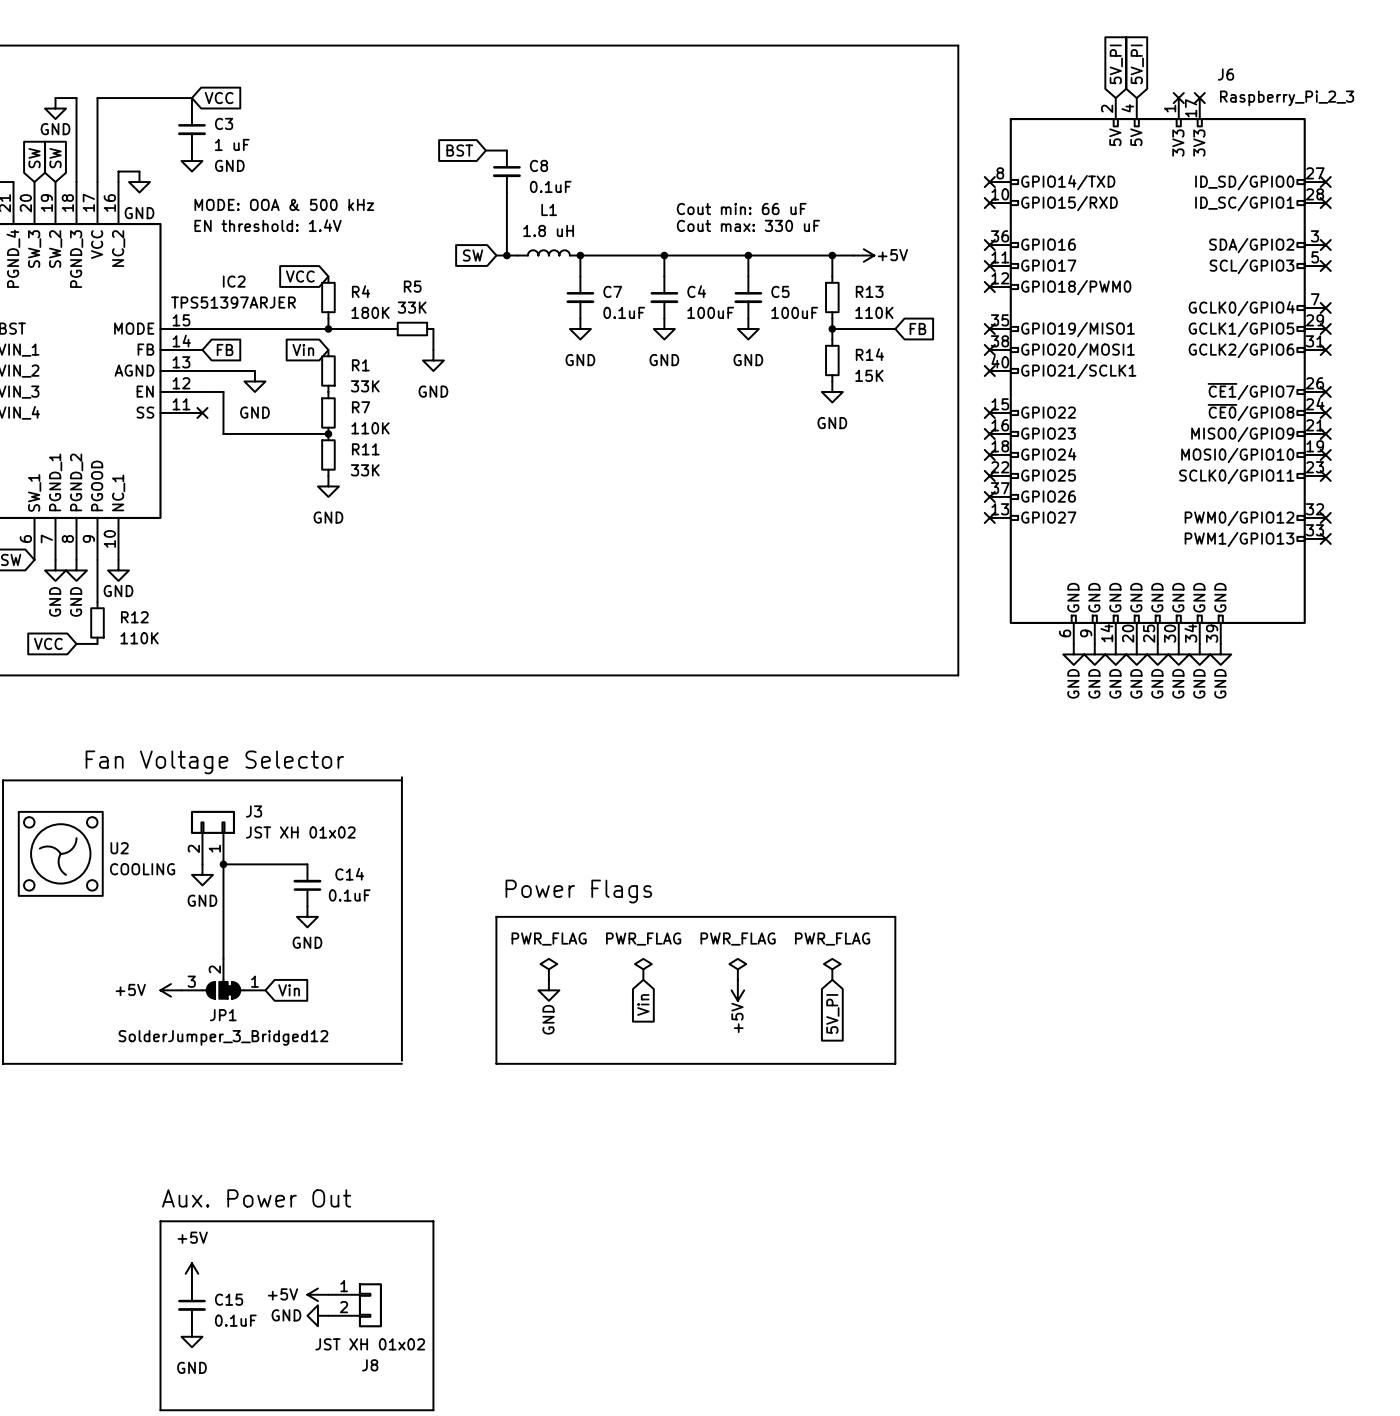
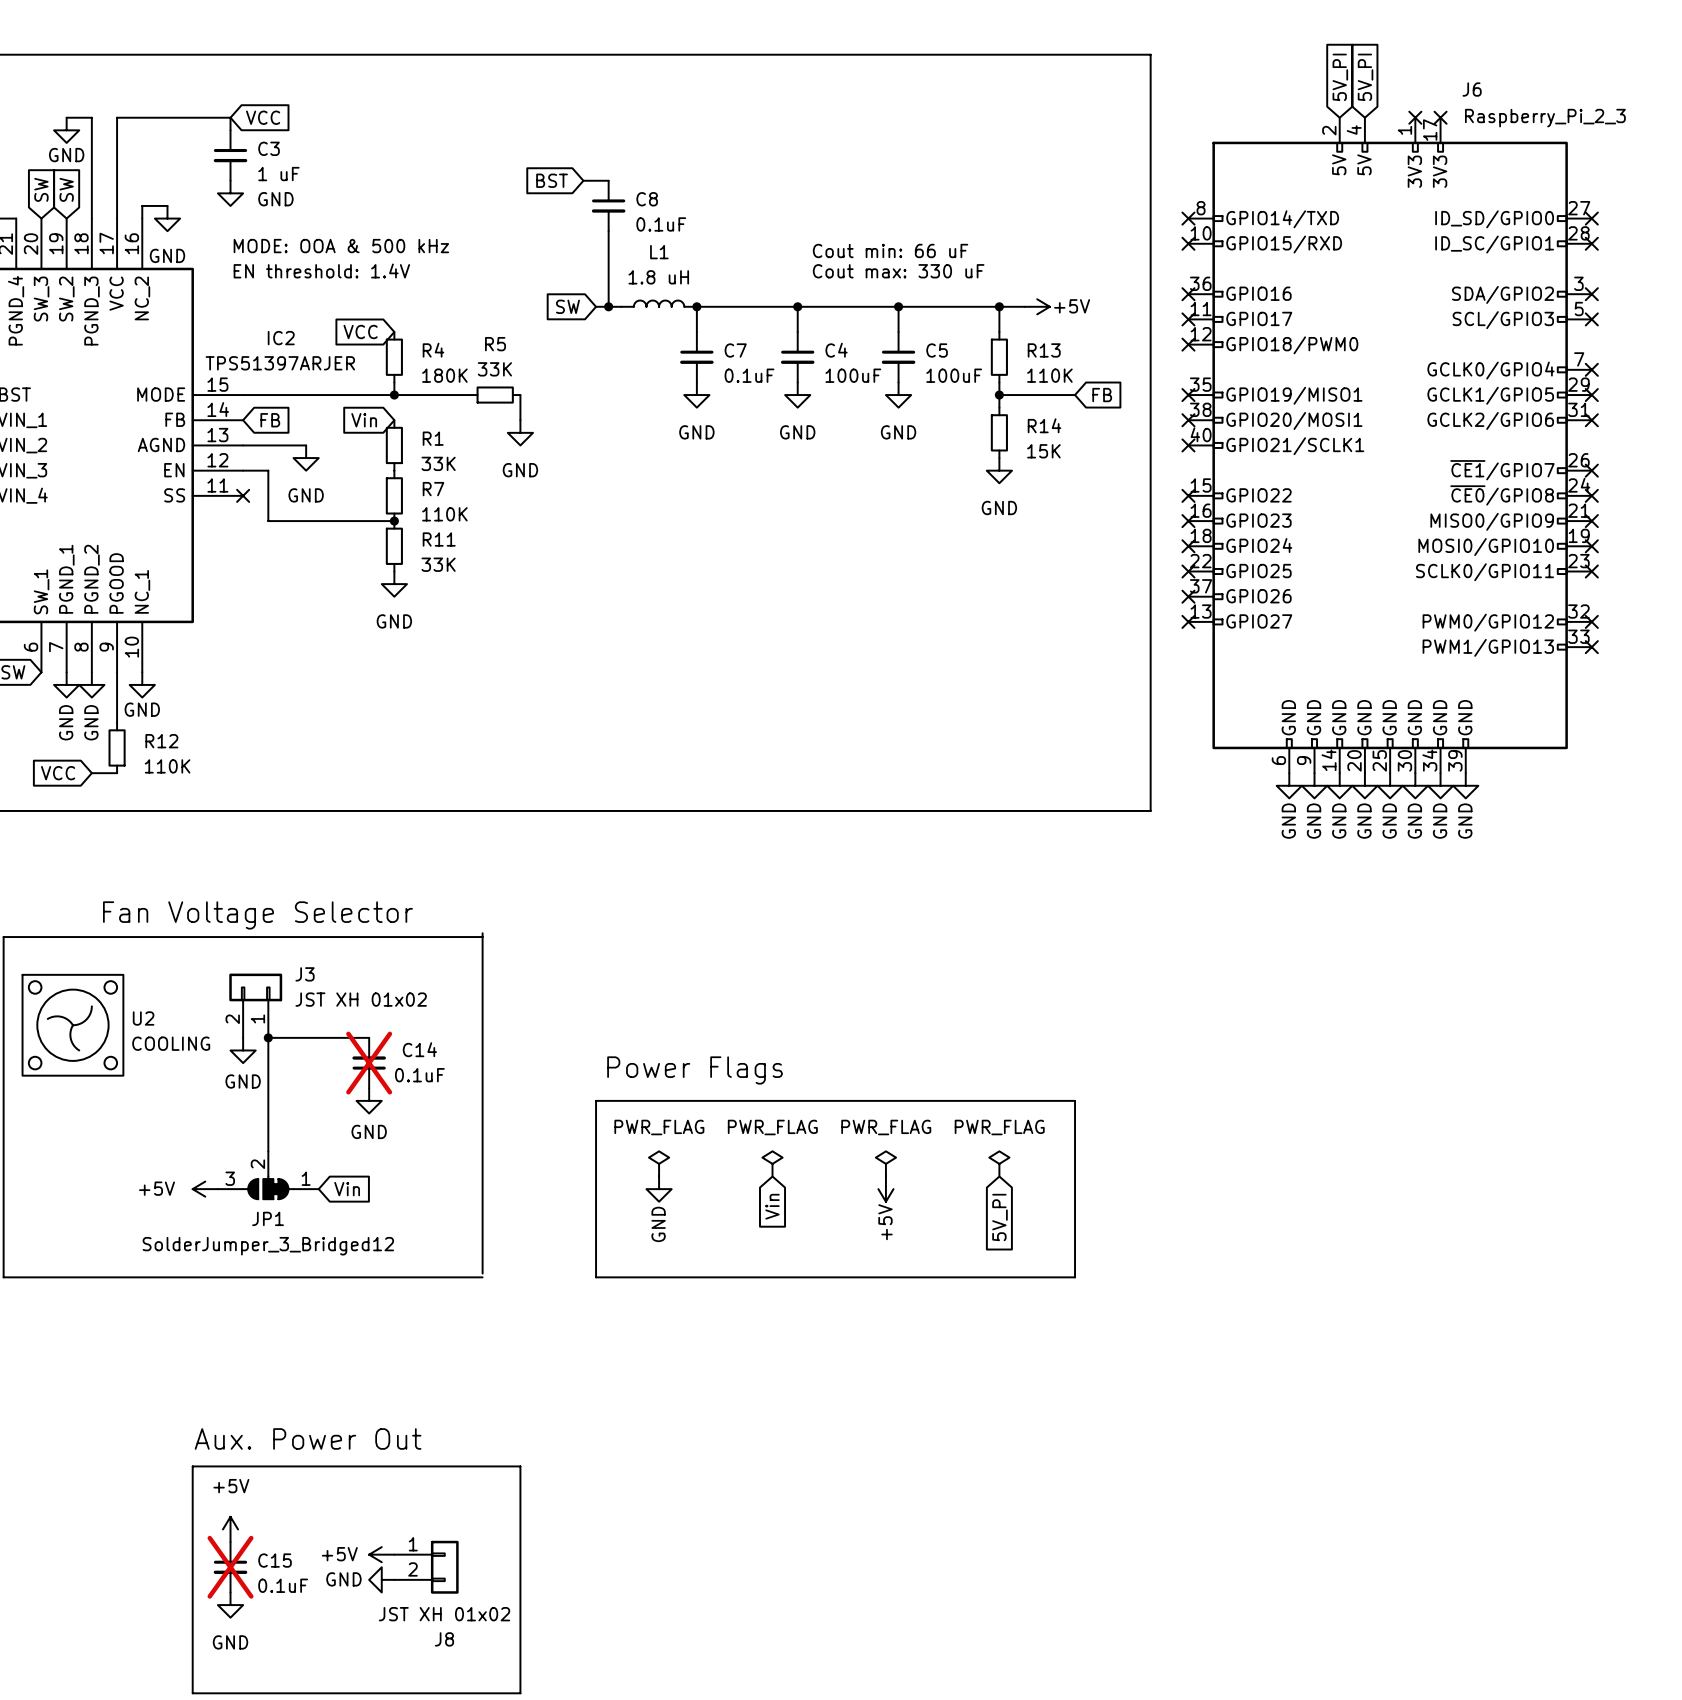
C14 do-not-place cross: none -> (369, 1063)
C15 do-not-place cross: none -> (230, 1567)

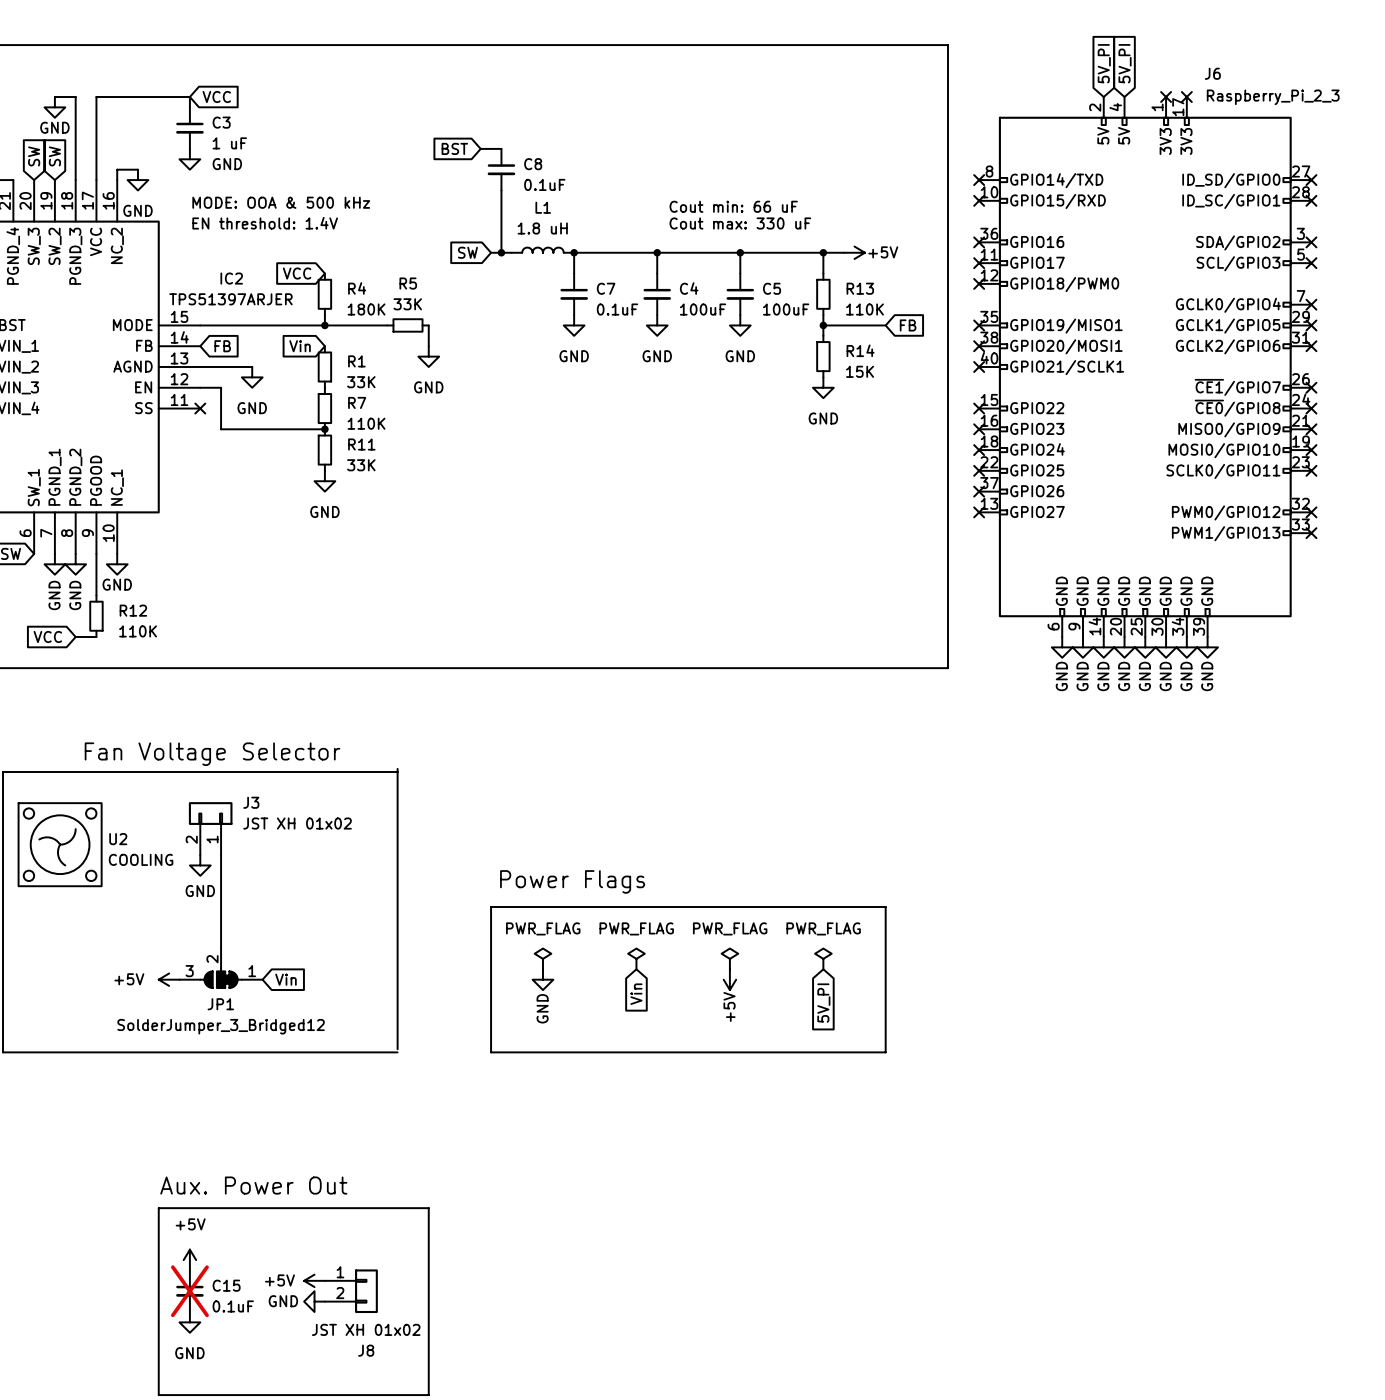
wire: (268, 1037) (369, 1037) -> none
junction: (268, 1037) -> none
C14: 0.1uF (369, 1063) -> none
power symbol: GND (369, 1100) -> none

